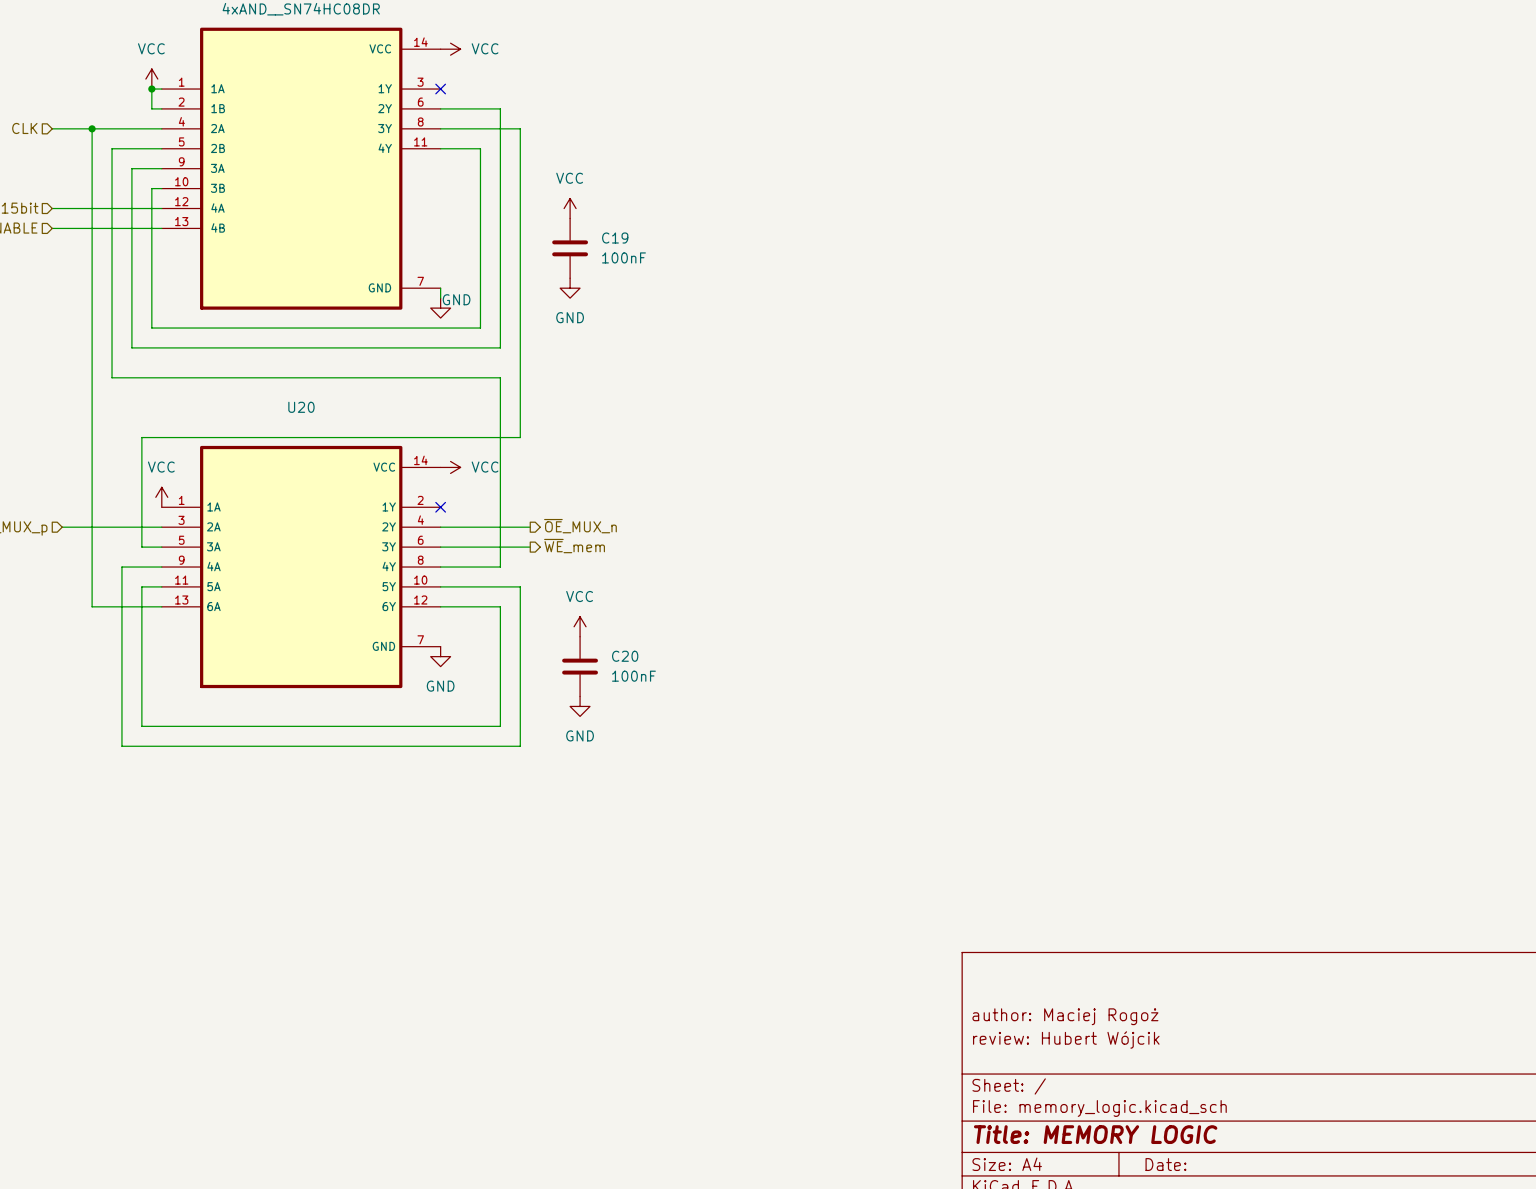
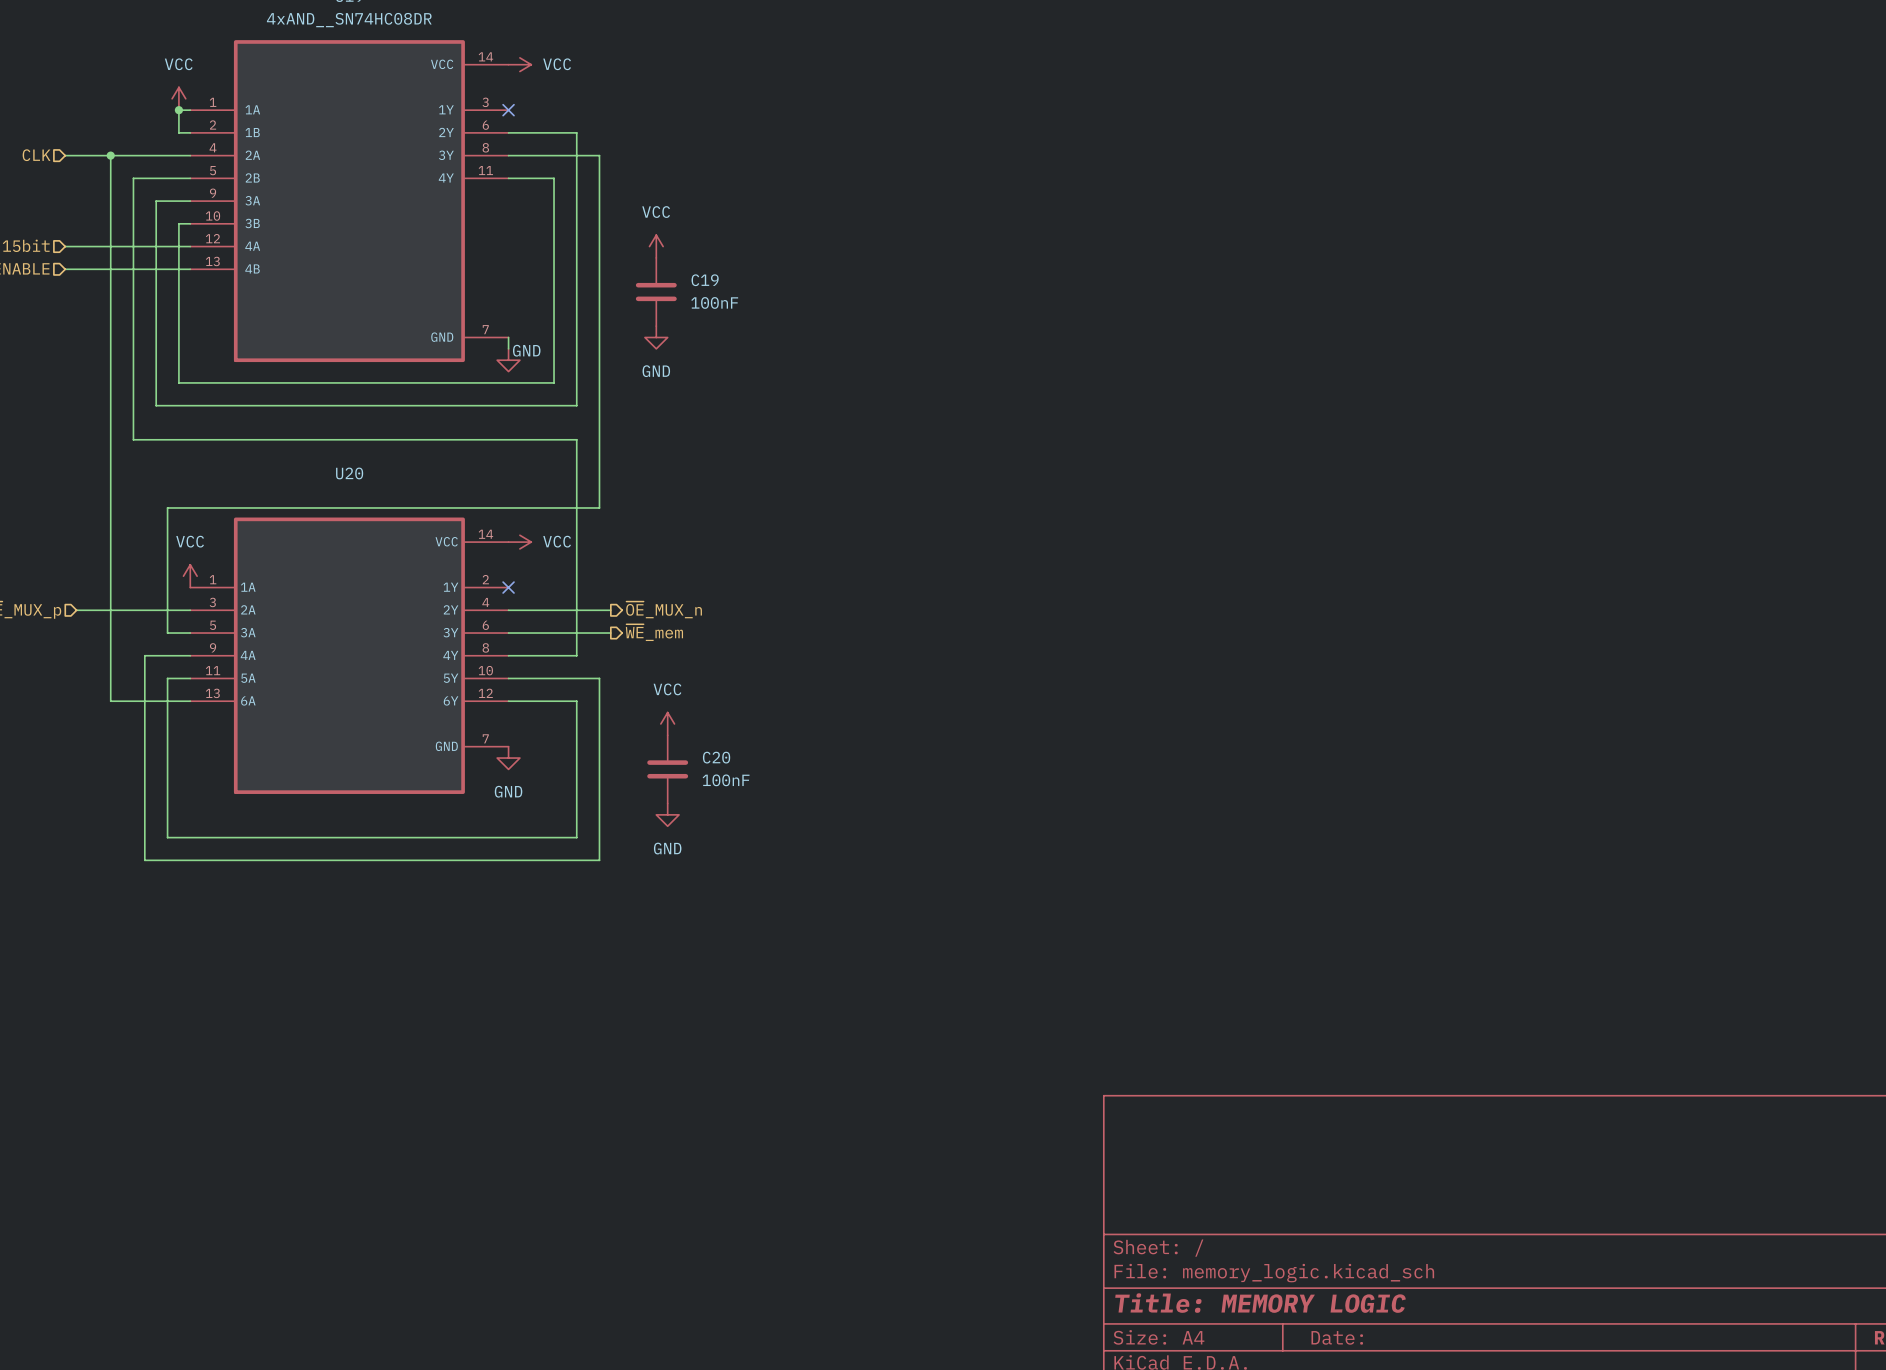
title block: author: Maciej Rogoż (1065, 1016) -> none
title block: review: Hubert Wójcik (1066, 1039) -> none

